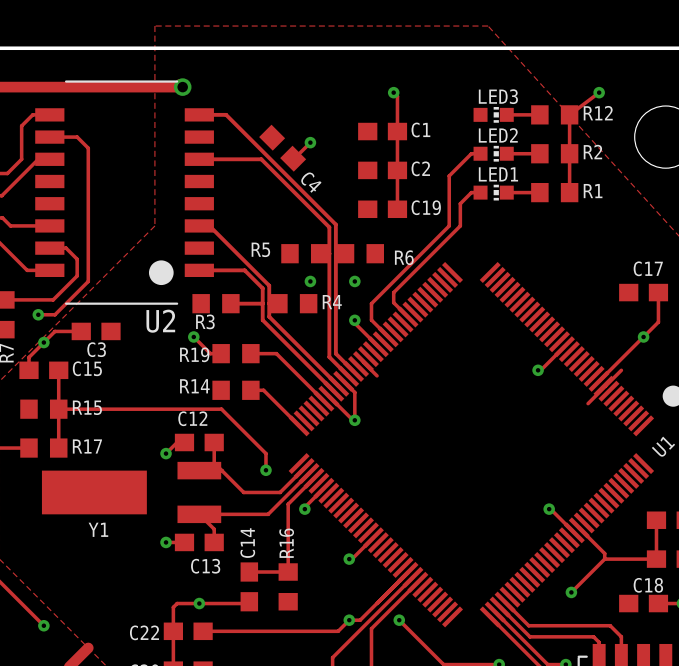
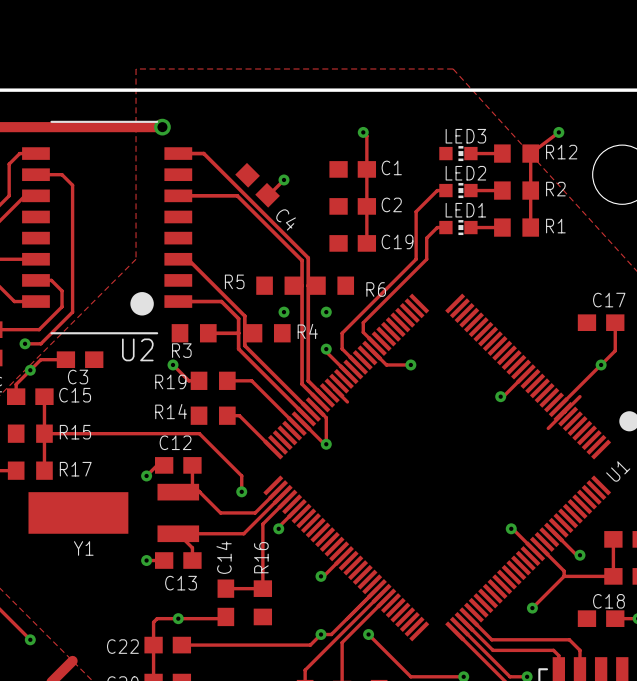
track: none -> (372, 350) (386, 364) (410, 364)
via: none -> (410, 364)
track: none -> (554, 532) (576, 555) (579, 555)
via: none -> (579, 555)

